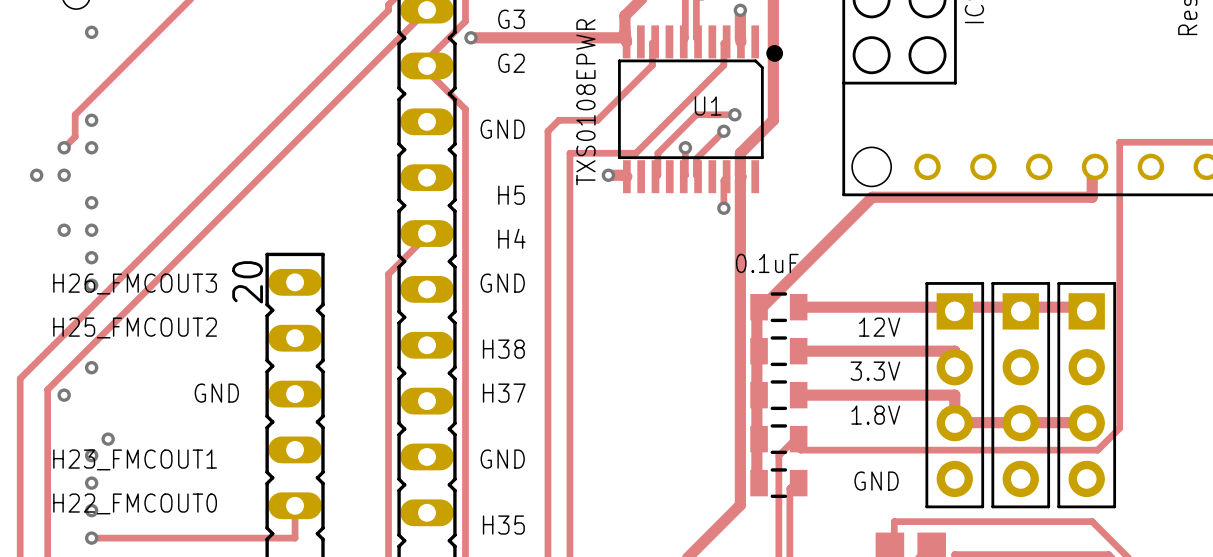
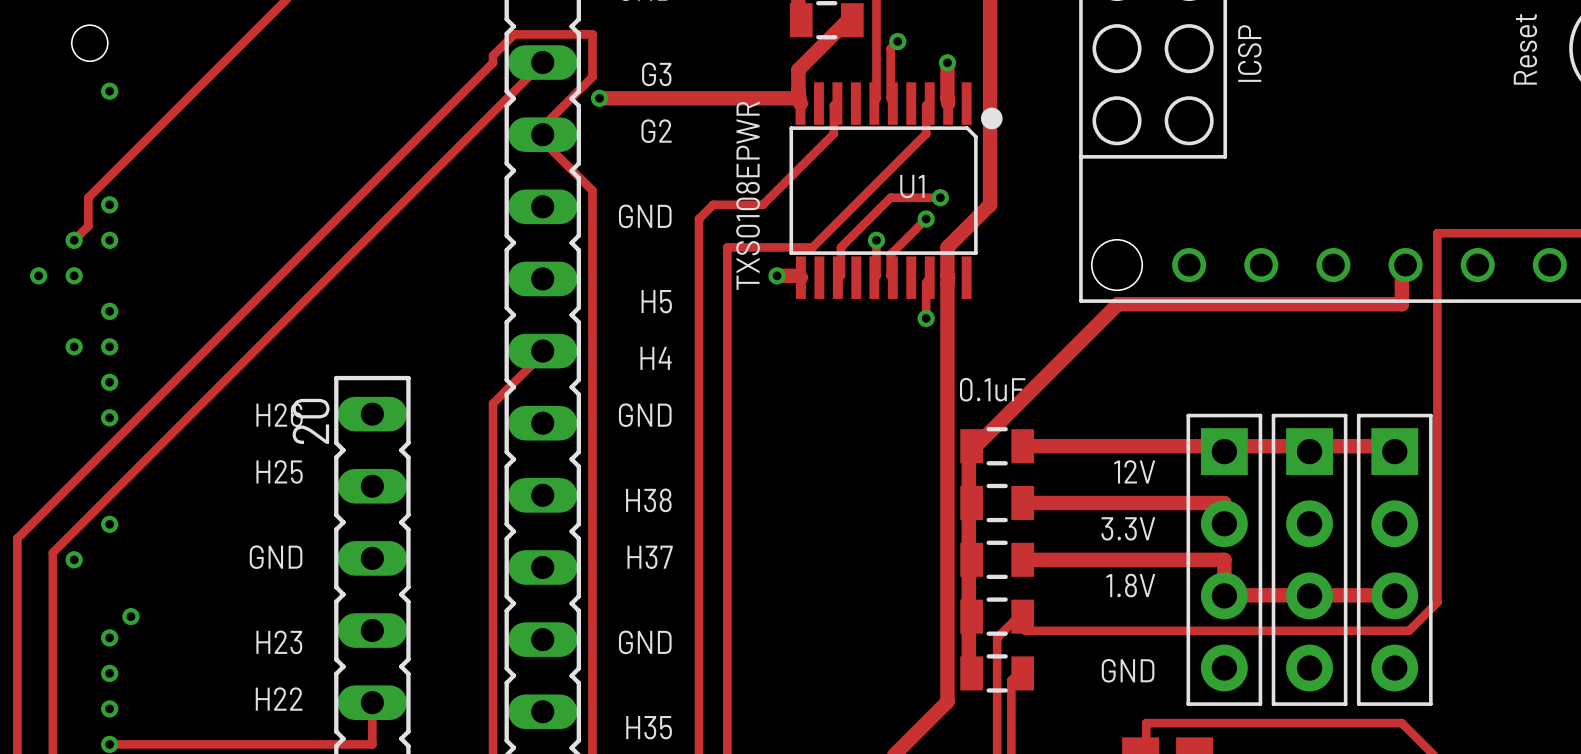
text: H26_FMCOUT3 (135, 284) -> H26 (279, 415)
text: H25_FMCOUT2 (135, 327) -> H25 (279, 471)
text: H23_FMCOUT1 (135, 459) -> H23 (279, 642)
text: H22_FMCOUT0 (135, 503) -> H22 (279, 699)

